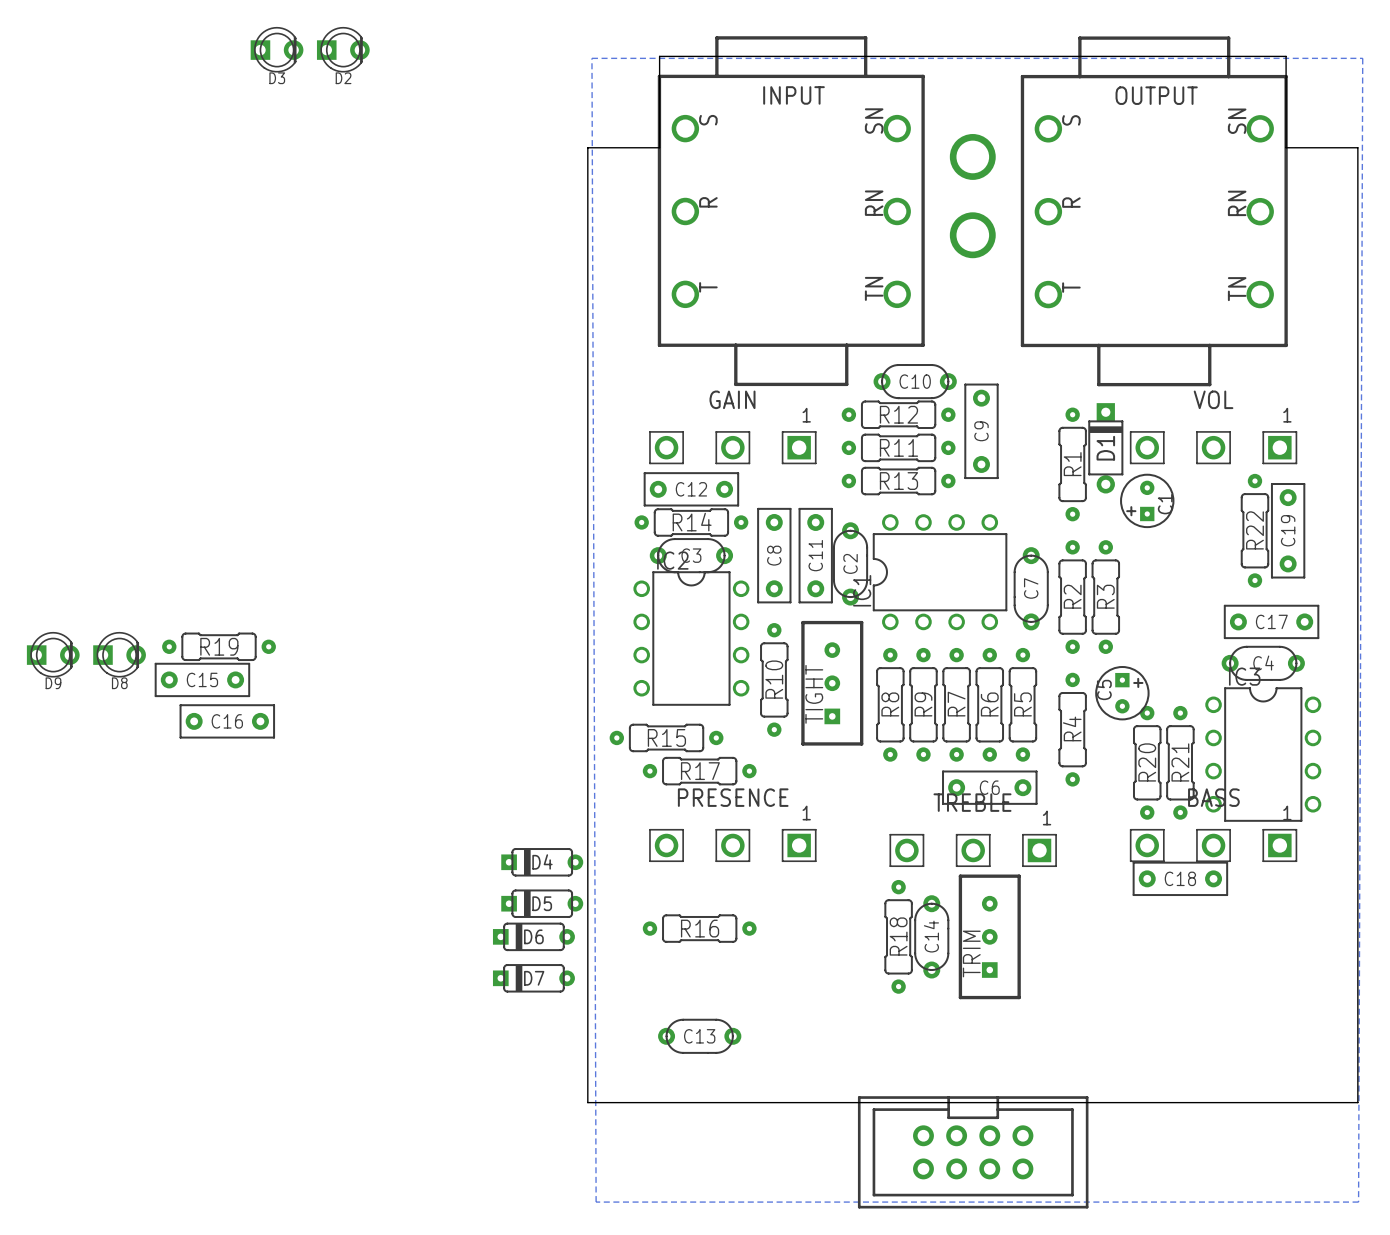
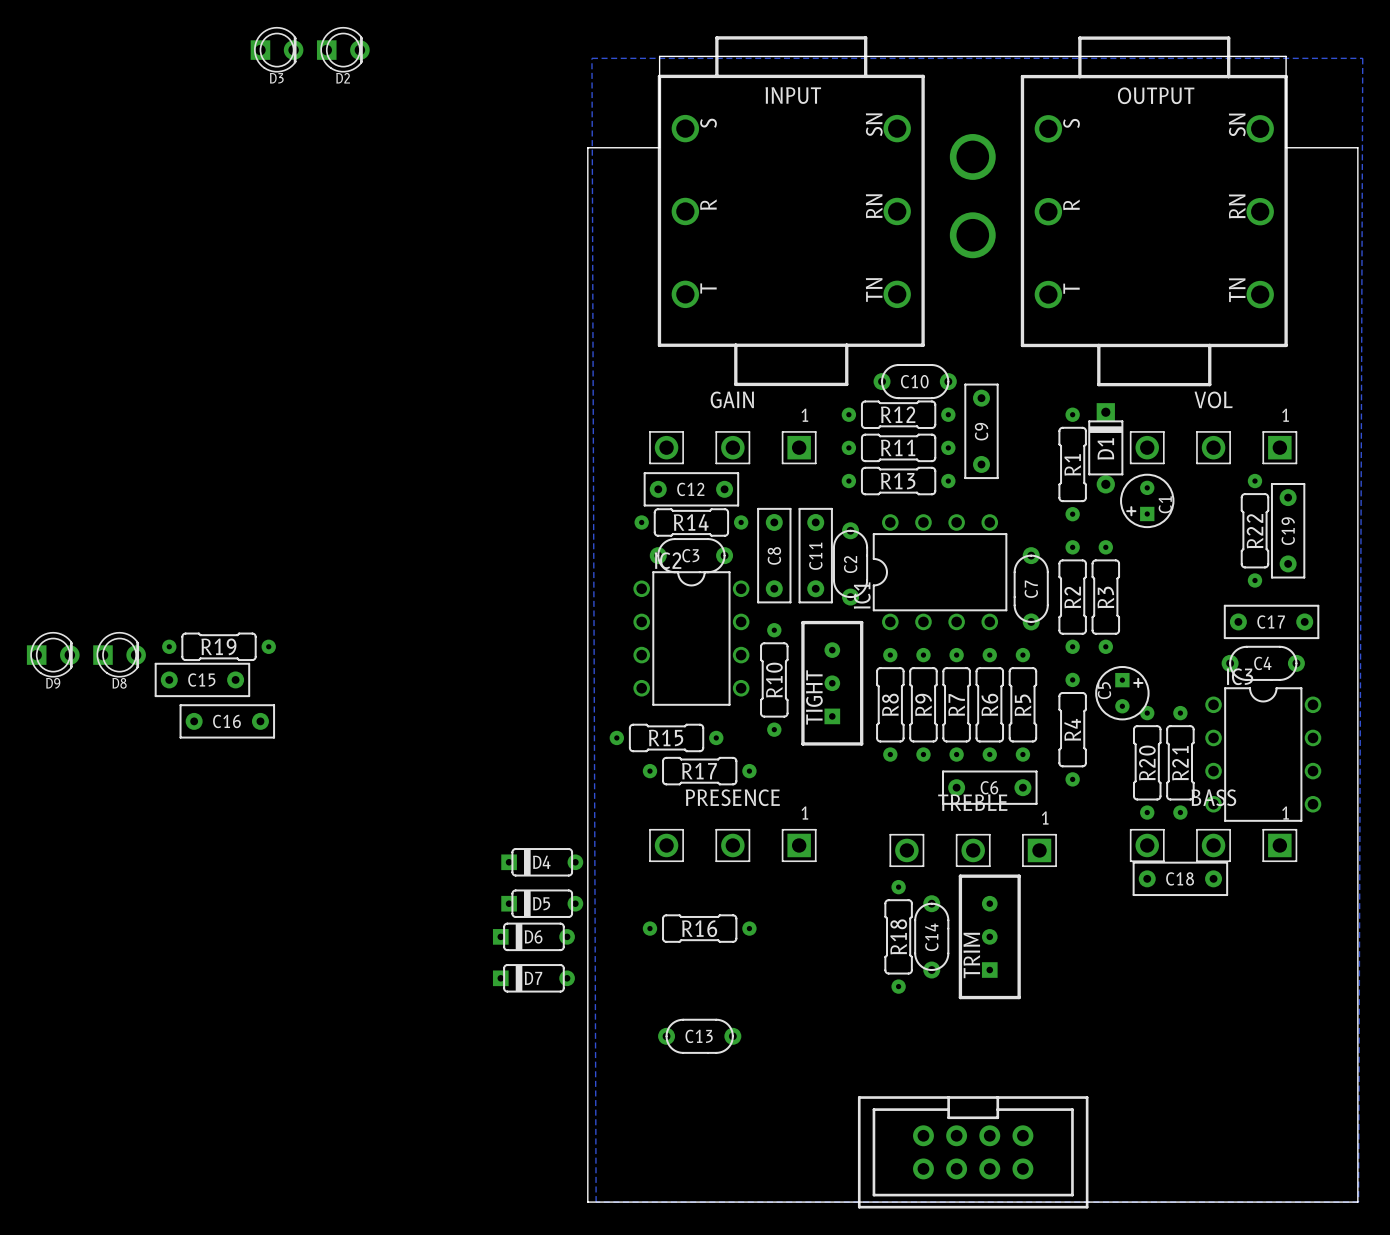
drawing: [587, 56, 1358, 1103] -> none
drawing: none -> [587, 56, 1358, 1203]

